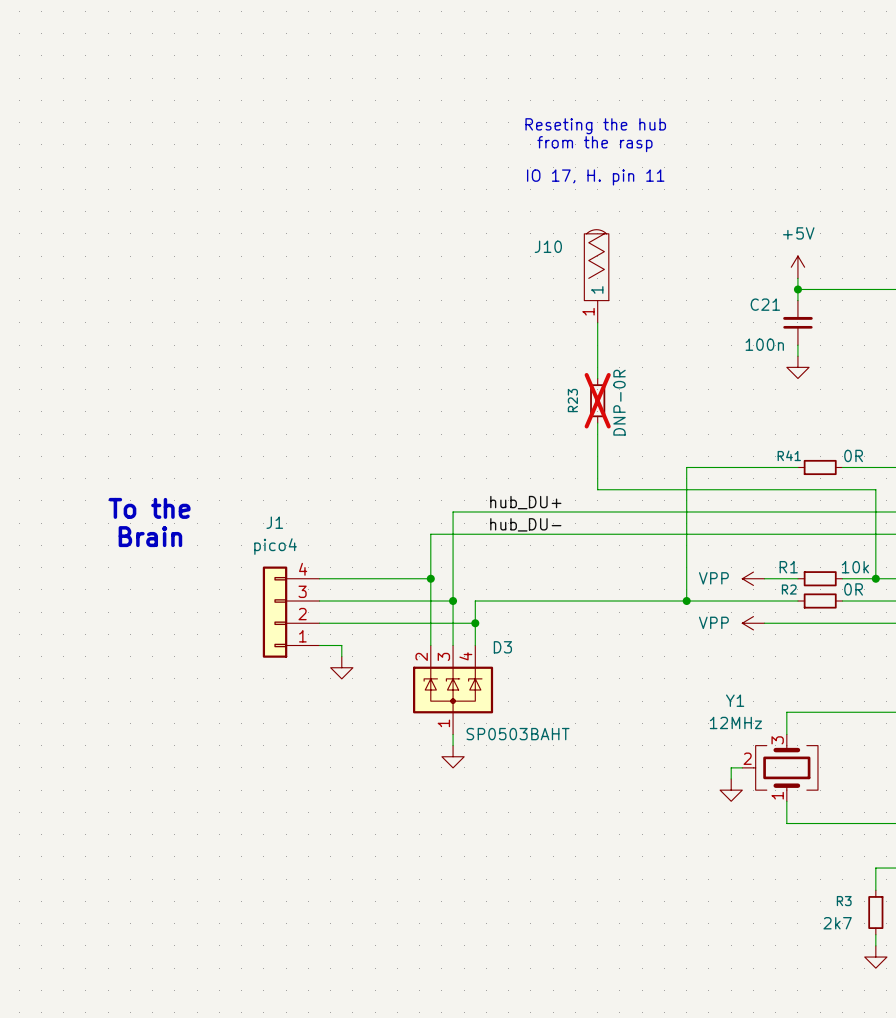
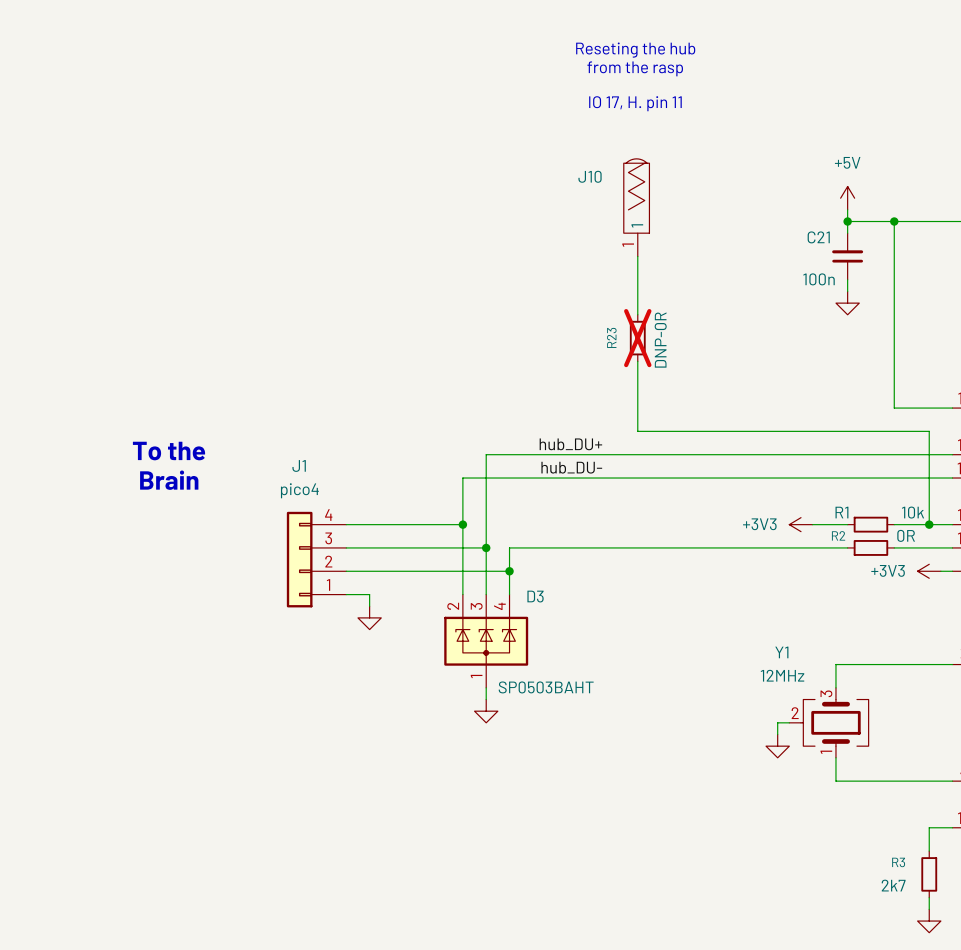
wire: none -> (894, 221) (894, 408)
junction: none -> (894, 221)
wire: (797, 467) (686, 467) (686, 601) -> none
R41: 0R (820, 467) -> none
power symbol: VPP (753, 578) -> +3V3 (801, 524)
junction: (686, 601) -> none
power symbol: VPP (753, 623) -> none
wire: (764, 623) (886, 623) -> none
power symbol: none -> +3V3 (929, 571)

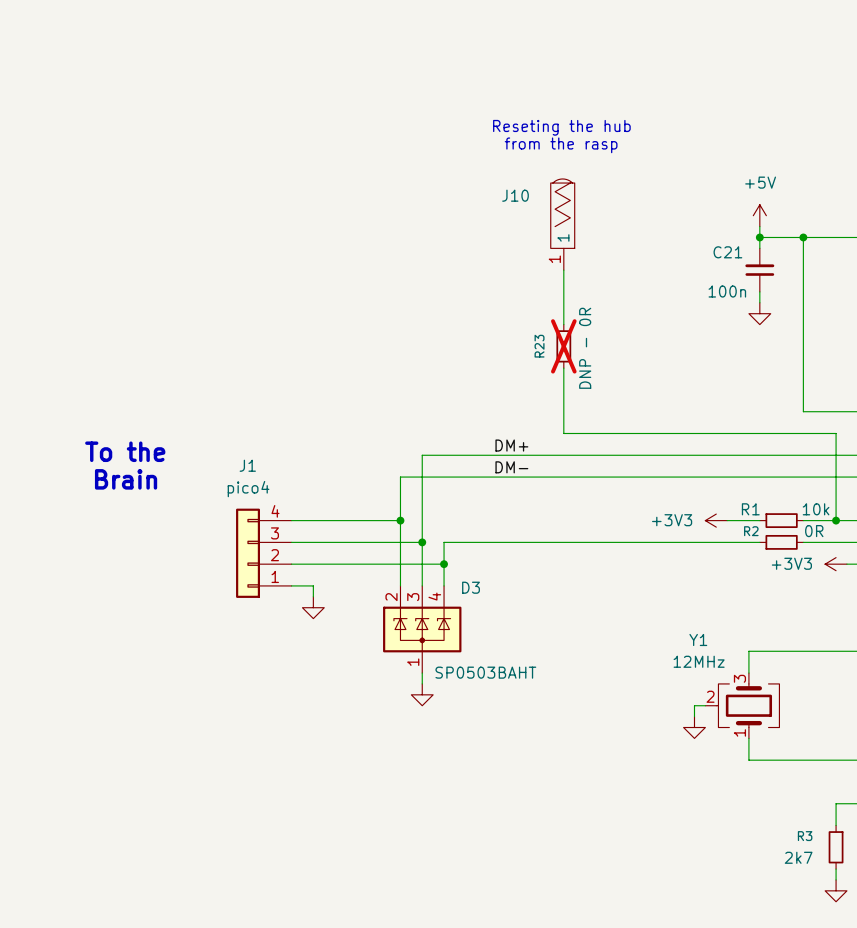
text: Reseting the hub (635, 50) -> none
text position: from the rasp (635, 68) -> from the rasp (561, 145)
text: IO 17, H. pin 11 (635, 103) -> Reseting the hub (561, 127)
R23 value: DNP-0R (660, 340) -> DNP - 0R (585, 348)
label: hub_DU+ (570, 444) -> DM+ (511, 445)
label: hub_DU- (571, 467) -> DM- (511, 467)

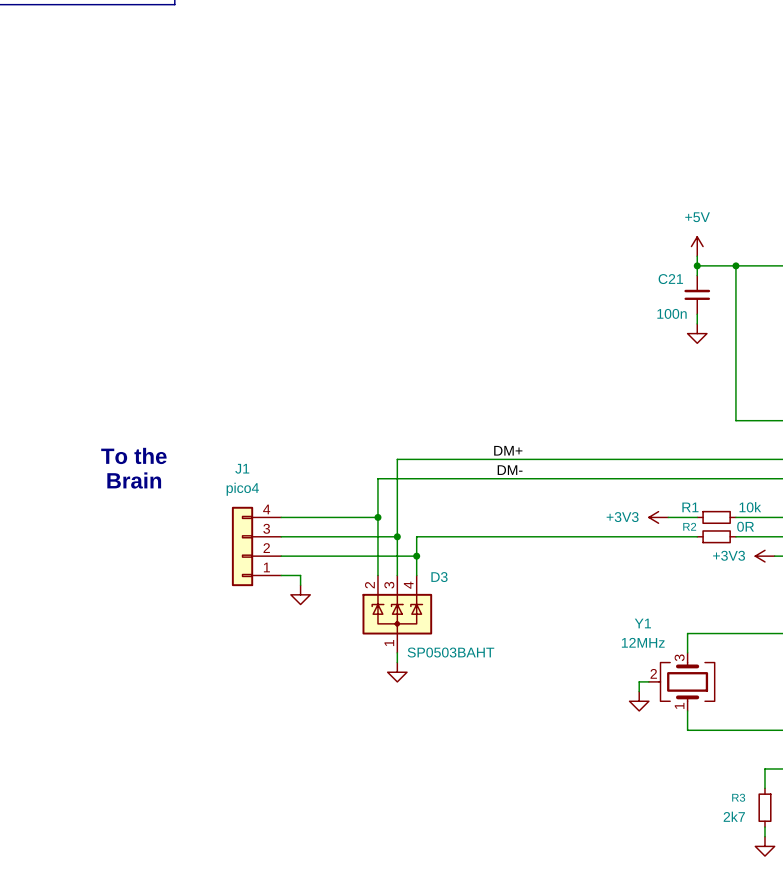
text: Reseting the hub (561, 127) -> none
text: from the rasp (561, 145) -> none
J10: (562, 224) -> none
wire: (563, 270) (563, 324) -> none
R23: DNP - 0R (563, 346) -> none
wire: (563, 368) (563, 433) (836, 433) (836, 520) -> none
label position: DM+ (511, 445) -> DM+ (508, 450)
label position: DM- (511, 467) -> DM- (510, 470)
junction: (836, 520) -> none

